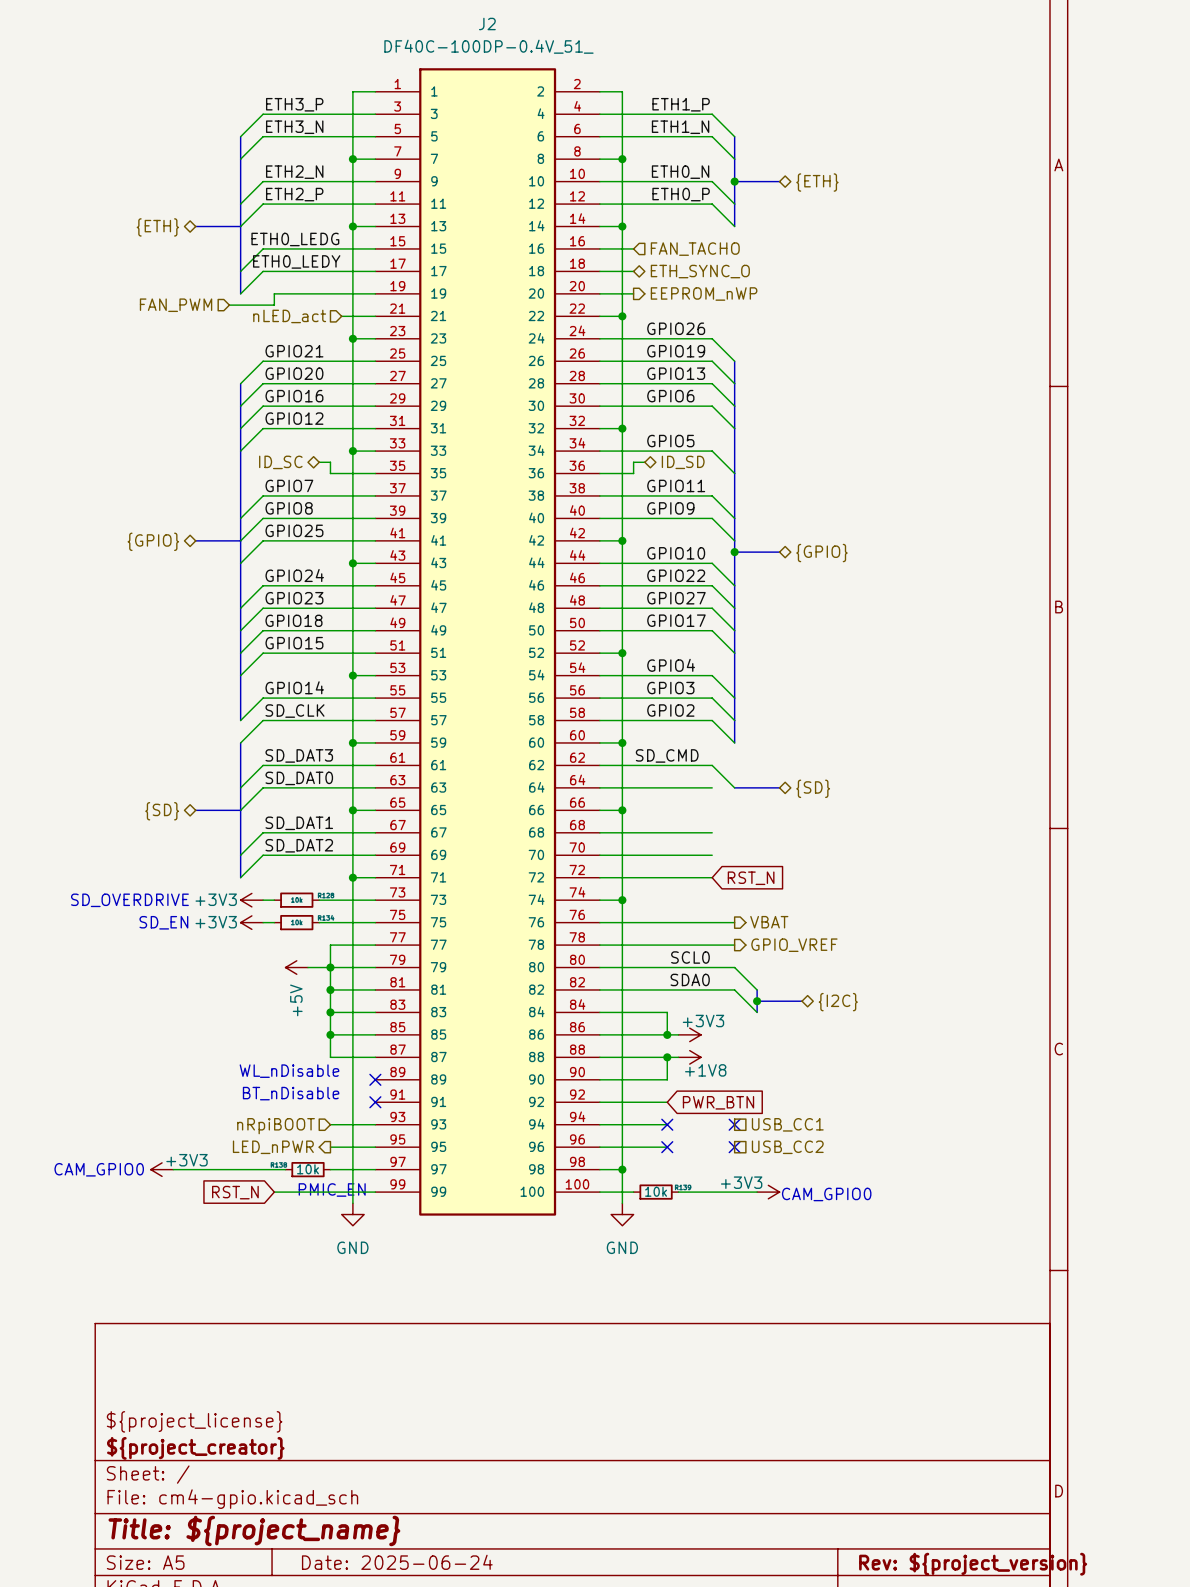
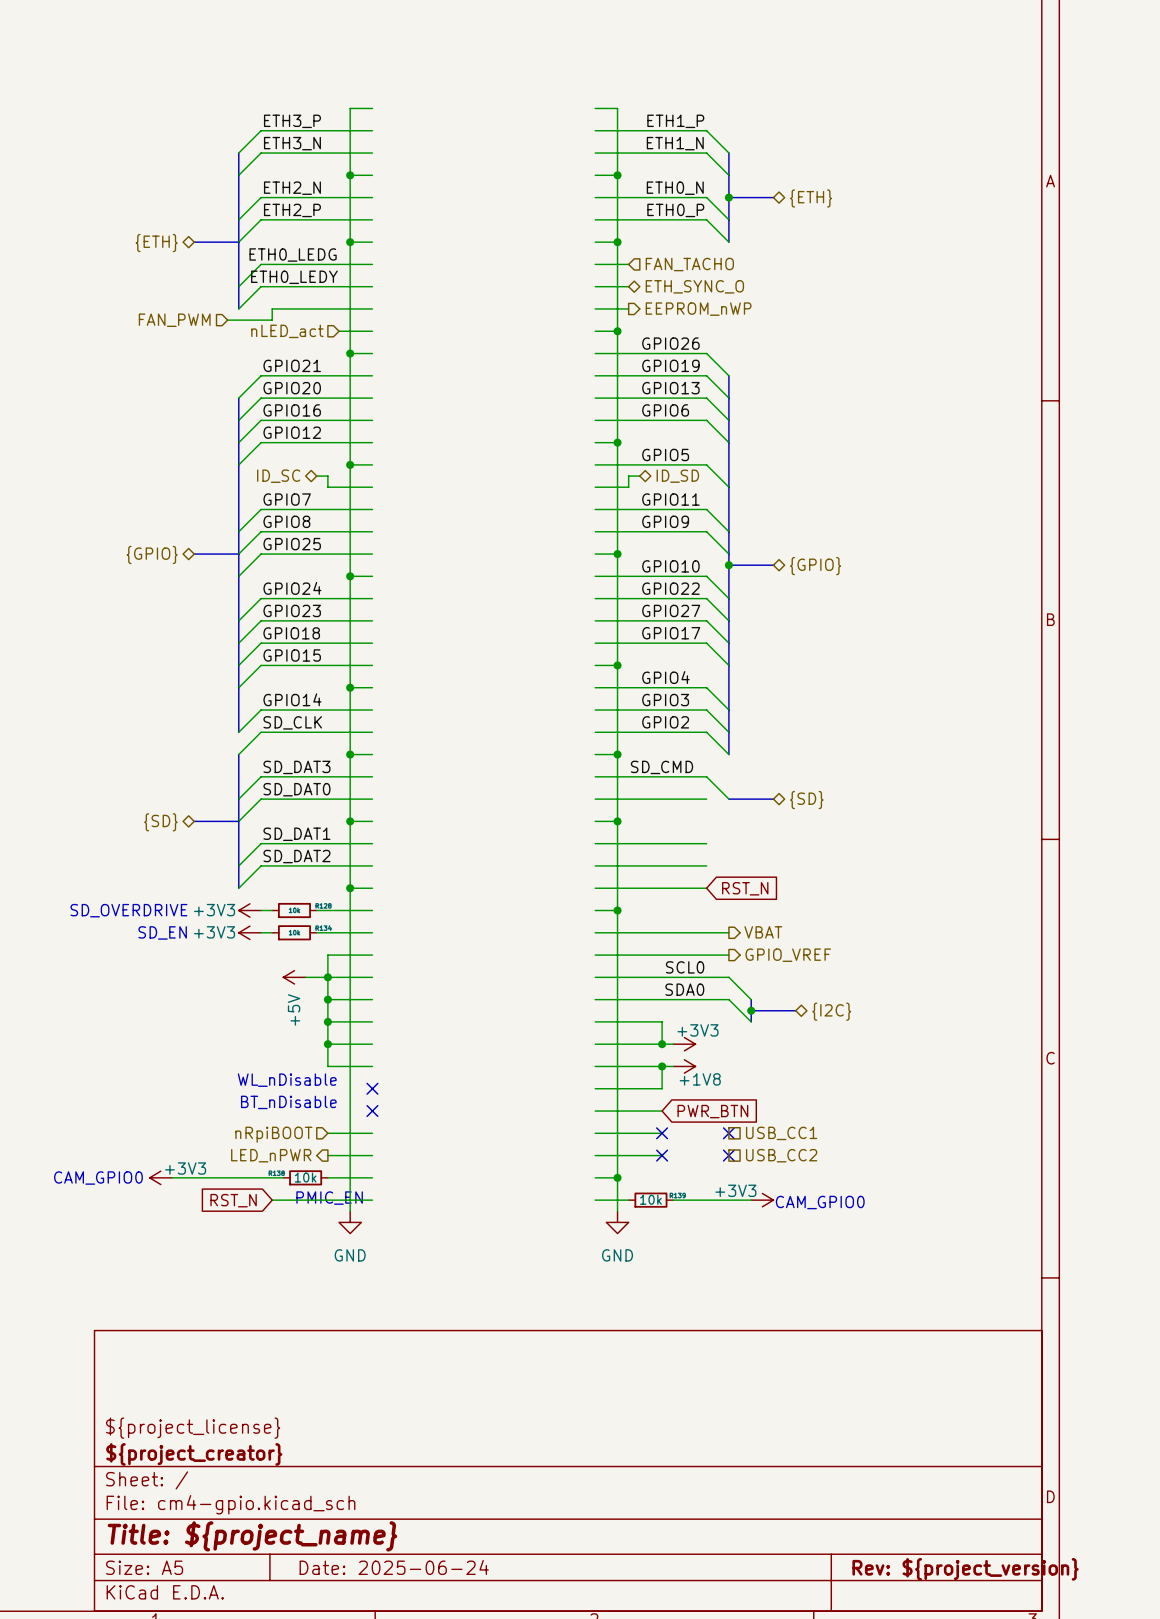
J2: DF40C-100DP-0.4V_51_ (487, 641) -> none

